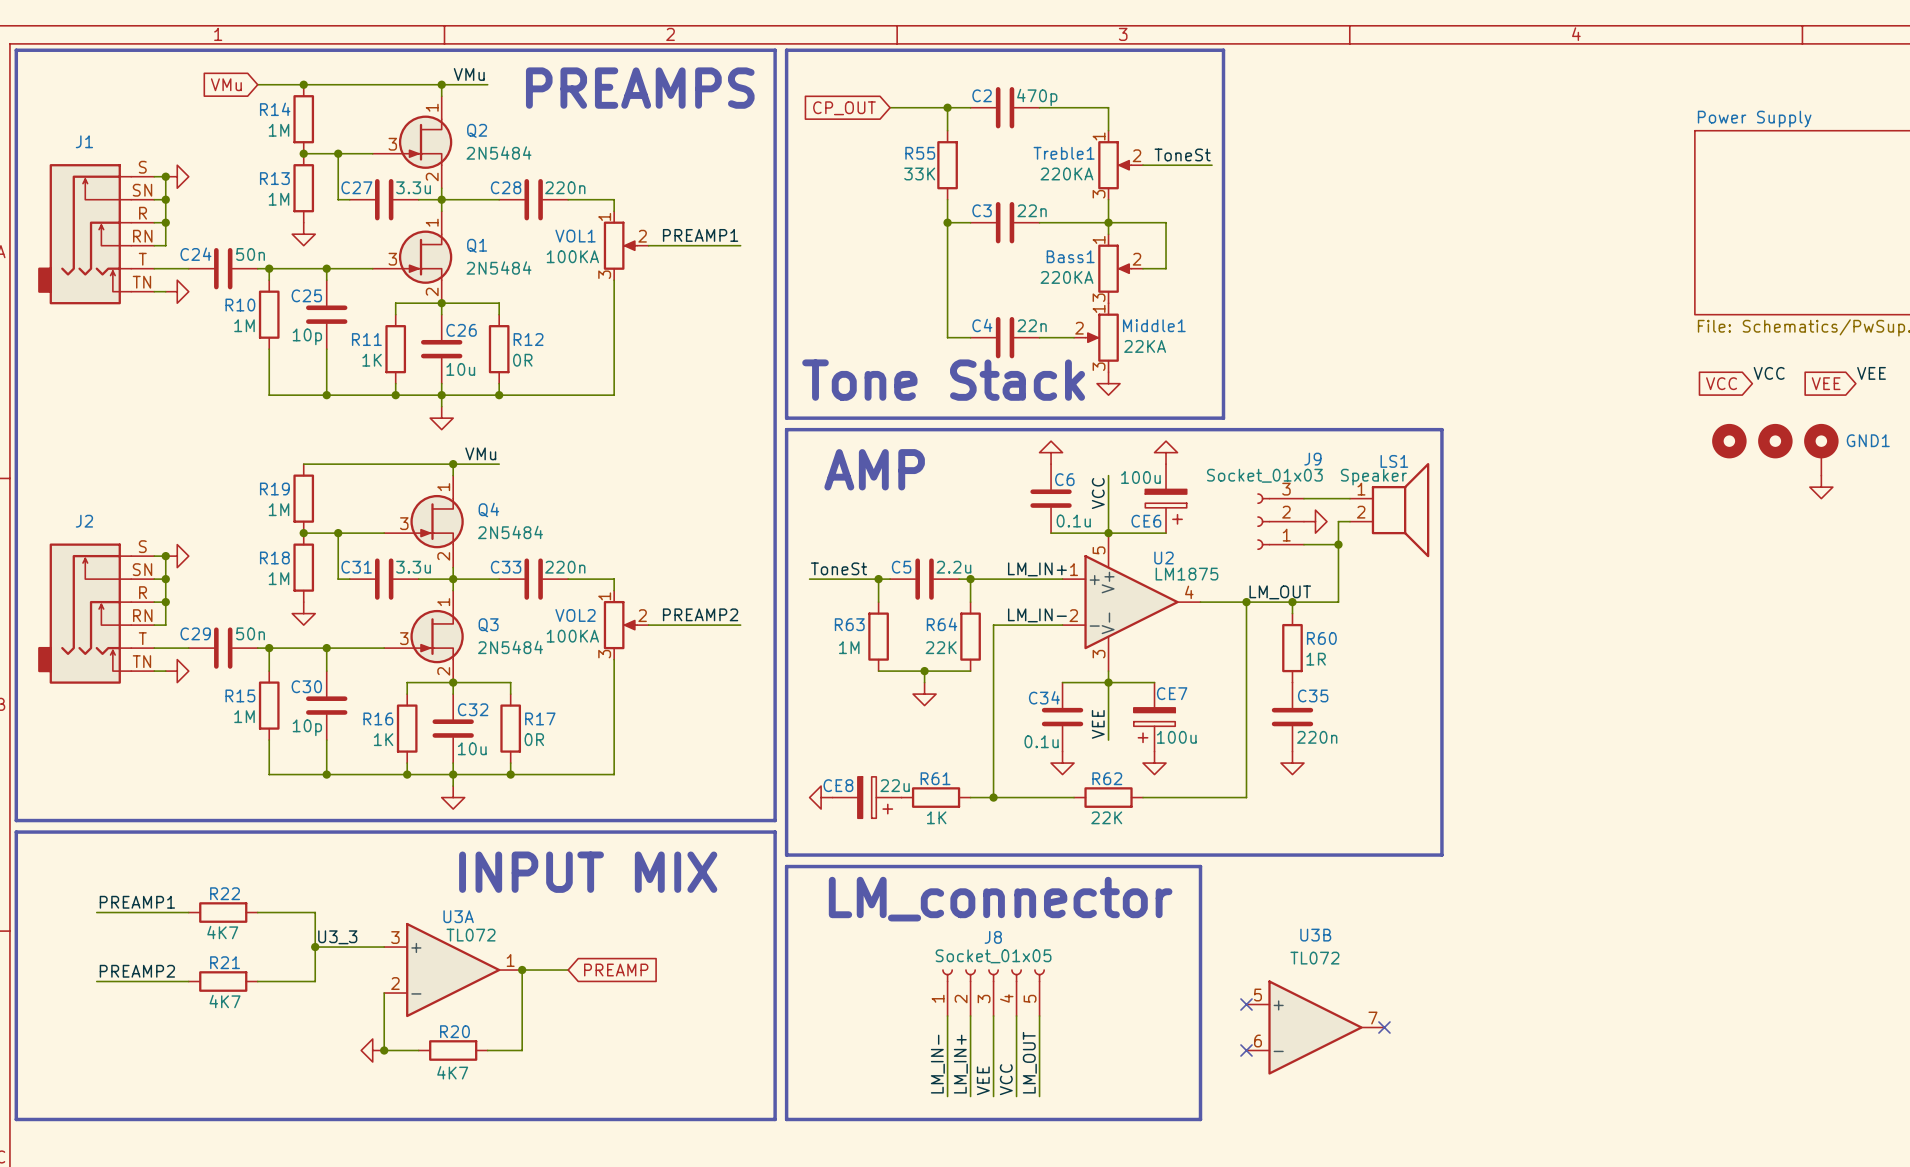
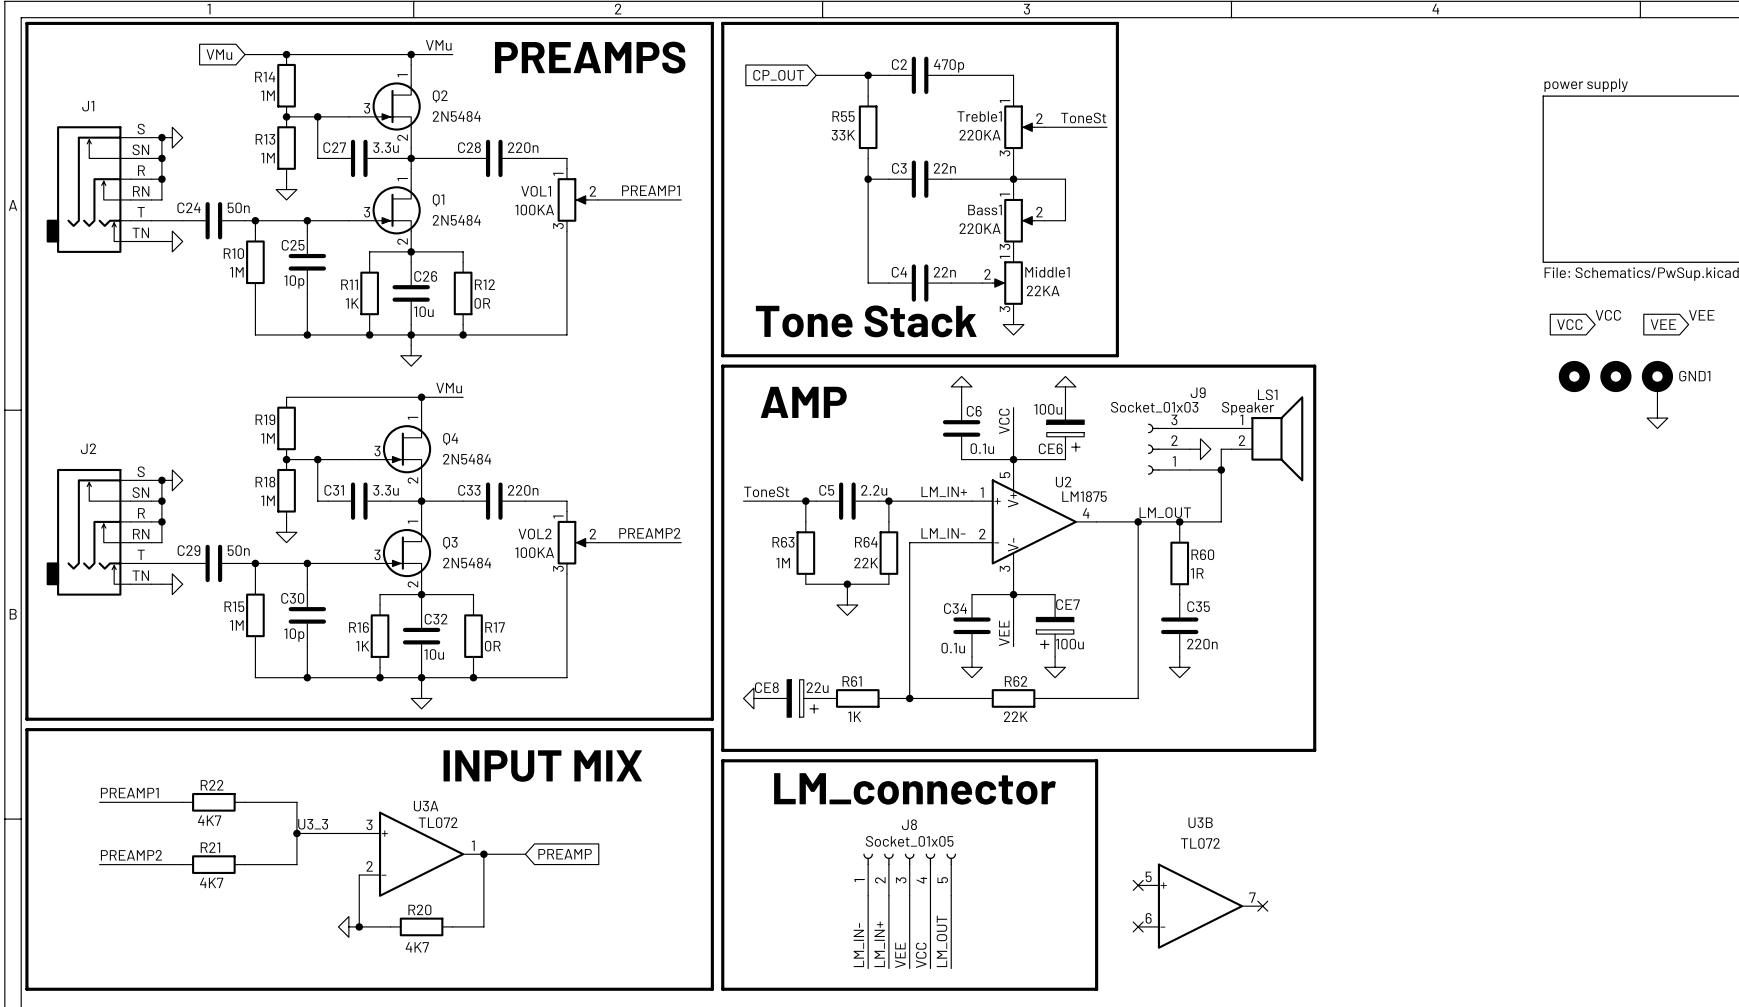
sheet Power Supply name: Power Supply (1754, 119) -> power supply (1586, 85)

